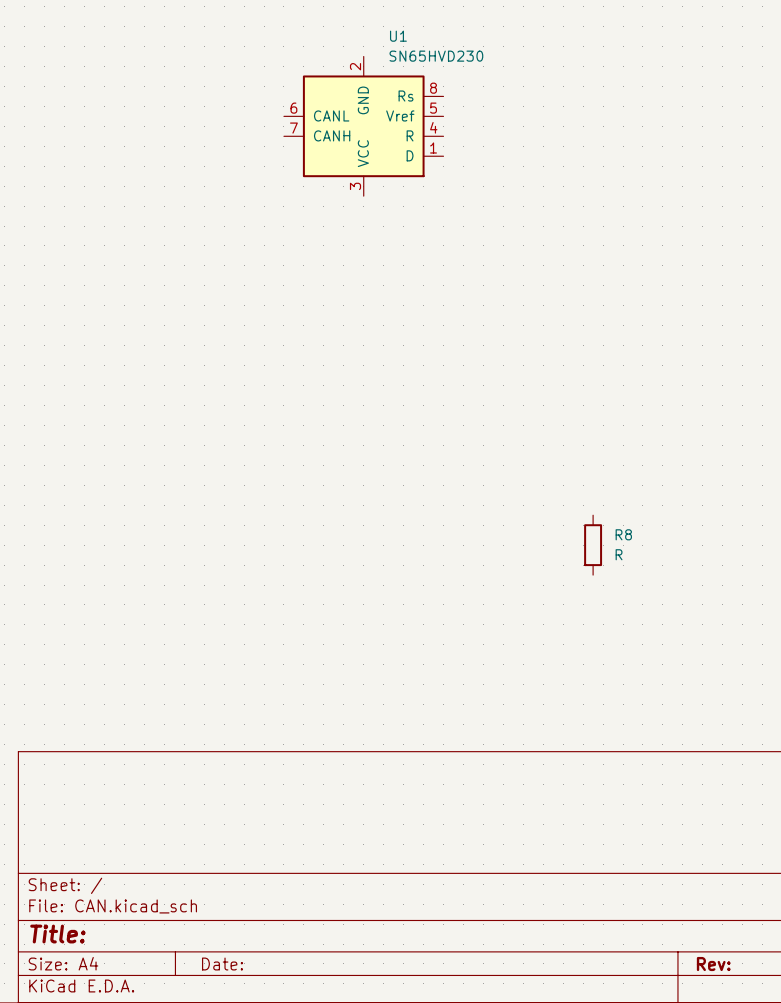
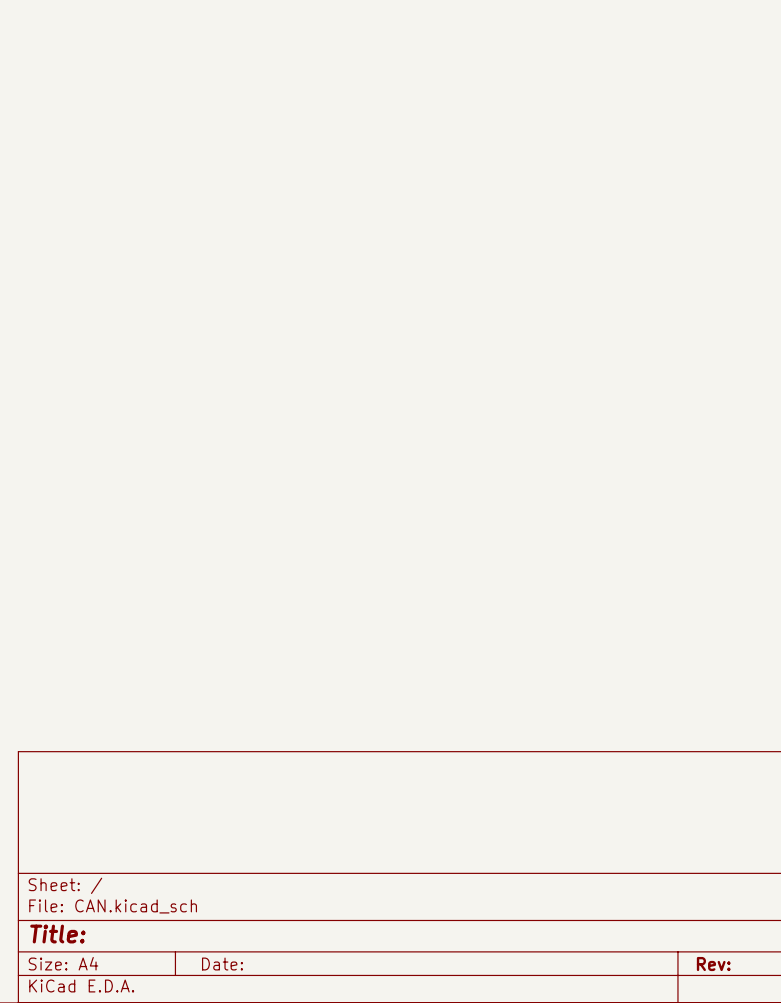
U1: SN65HVD230 (363, 126) -> none
R8: R (593, 545) -> none

